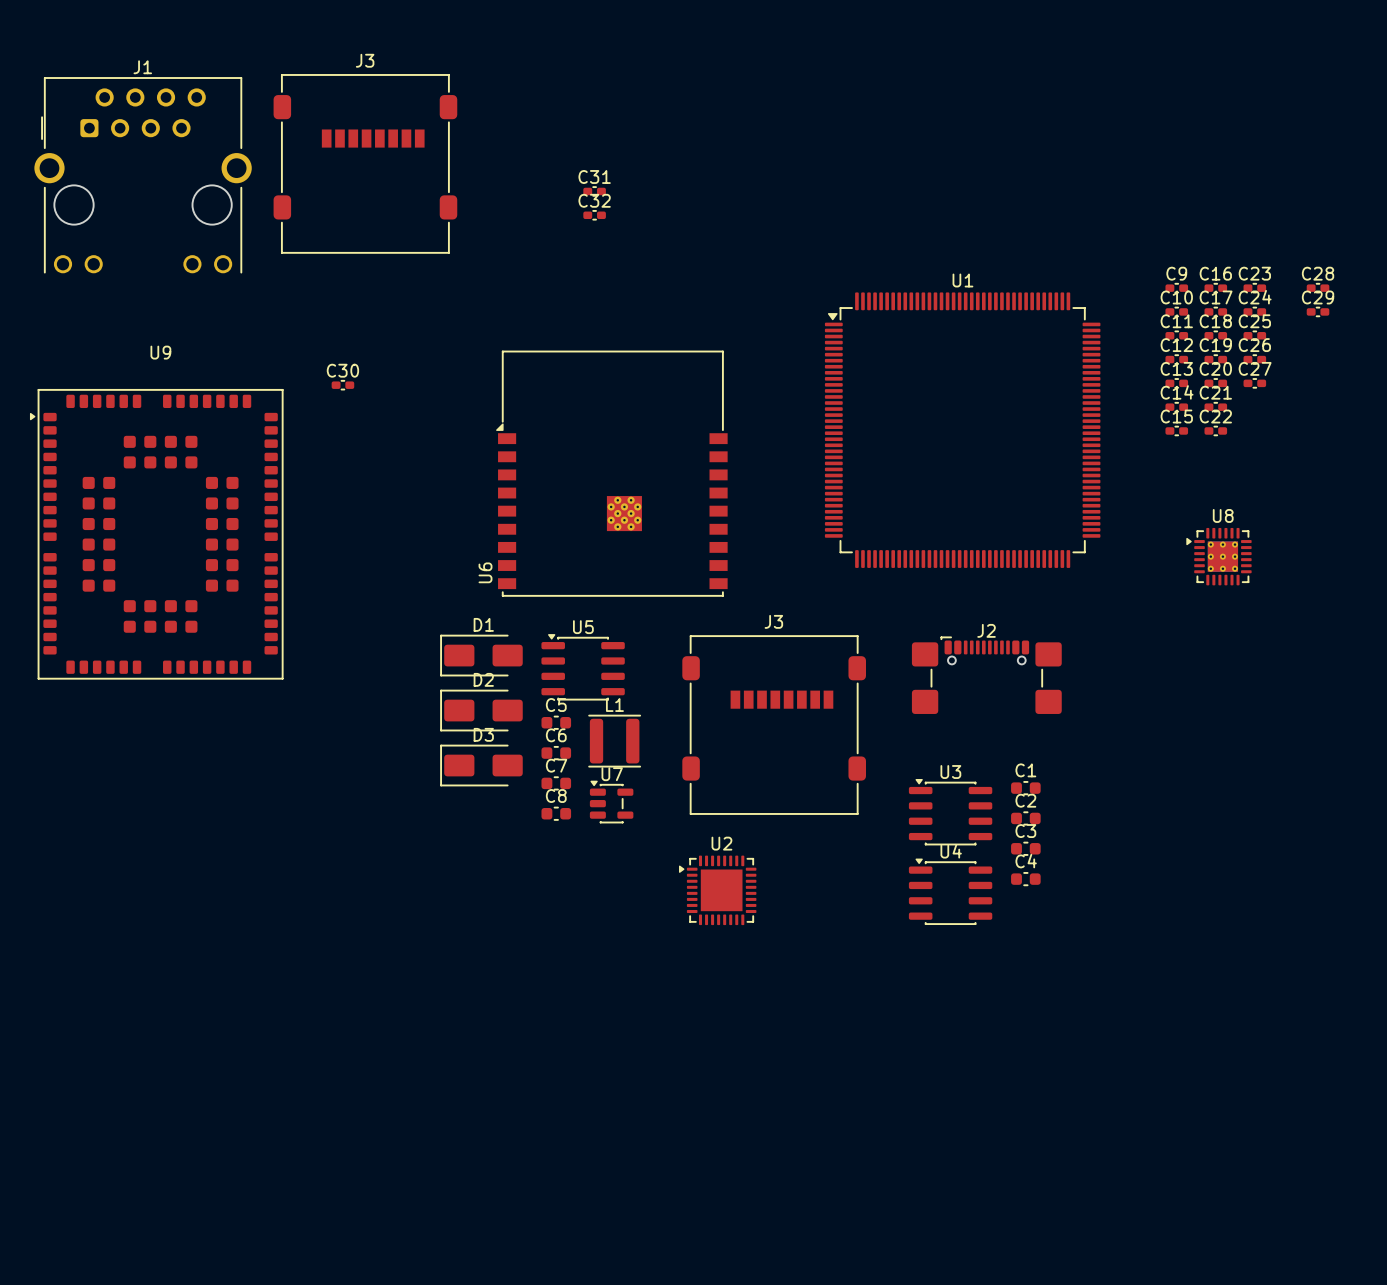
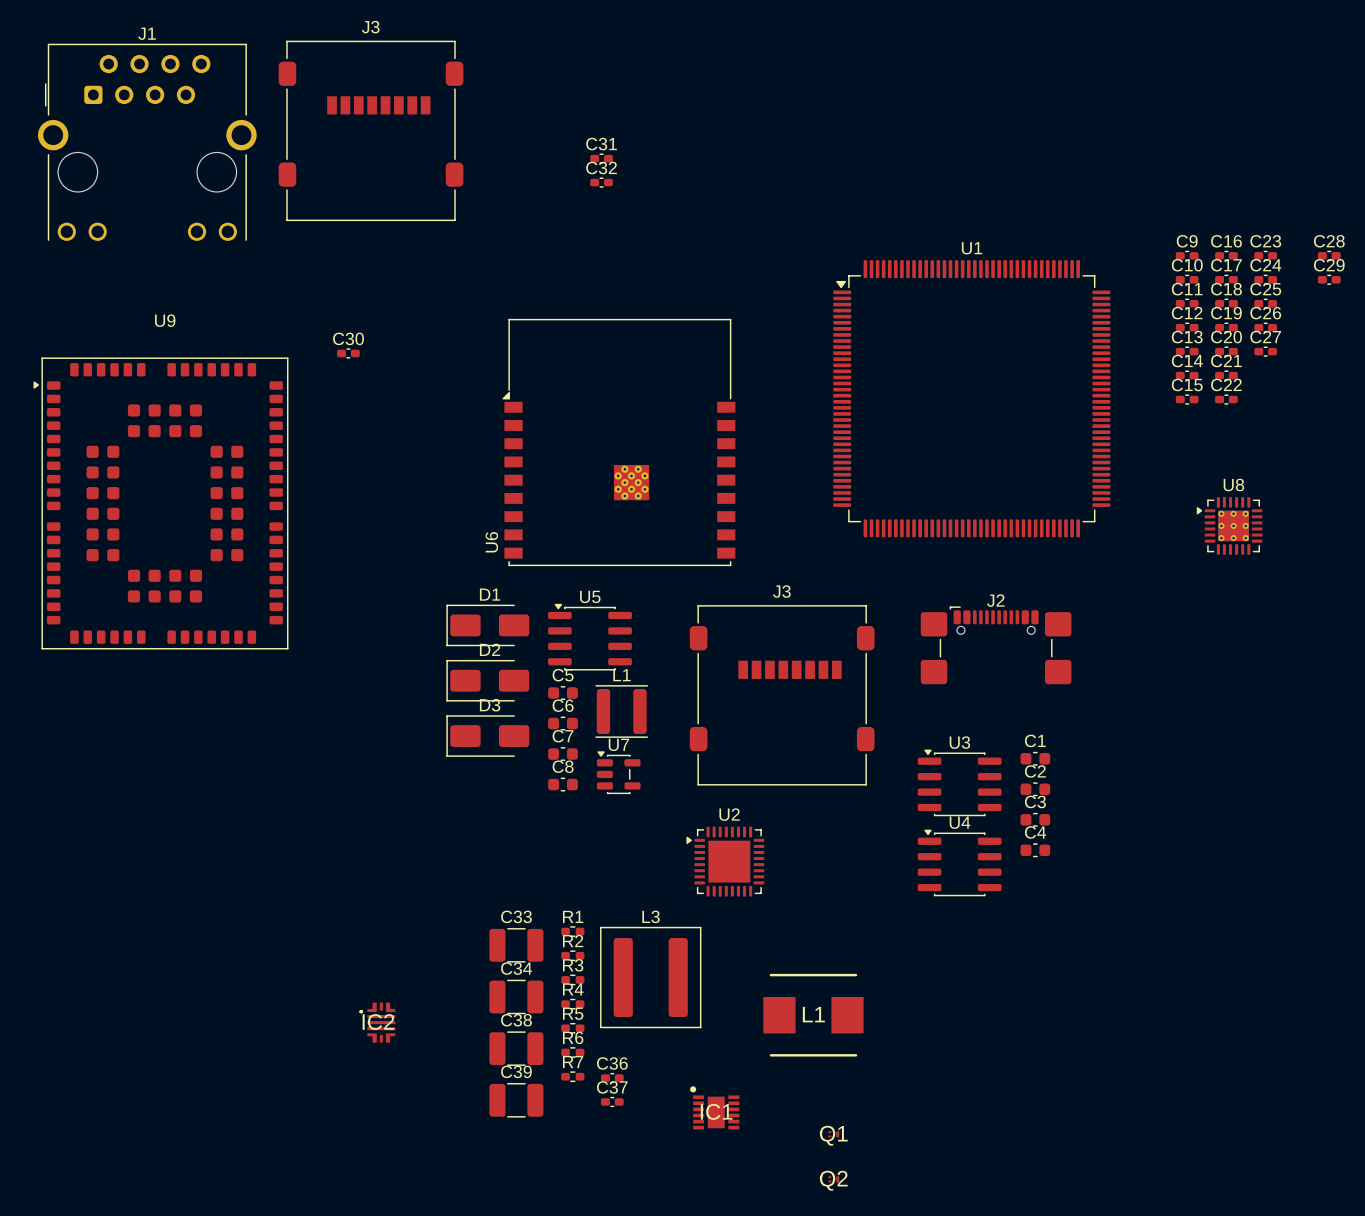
R1: none -> (572, 931)
C33: none -> (516, 945)
R2: none -> (572, 955)
L3: none -> (650, 977)
R3: none -> (572, 979)
C34: none -> (516, 996)
R4: none -> (572, 1004)
L1: none -> (813, 1015)
IC2: none -> (377, 1022)
R5: none -> (572, 1028)
C38: none -> (516, 1048)
R6: none -> (572, 1052)
R7: none -> (572, 1076)
C36: none -> (612, 1078)
C39: none -> (516, 1100)
C37: none -> (612, 1102)
IC1: none -> (714, 1107)
Q1: none -> (829, 1134)
Q2: none -> (829, 1179)

